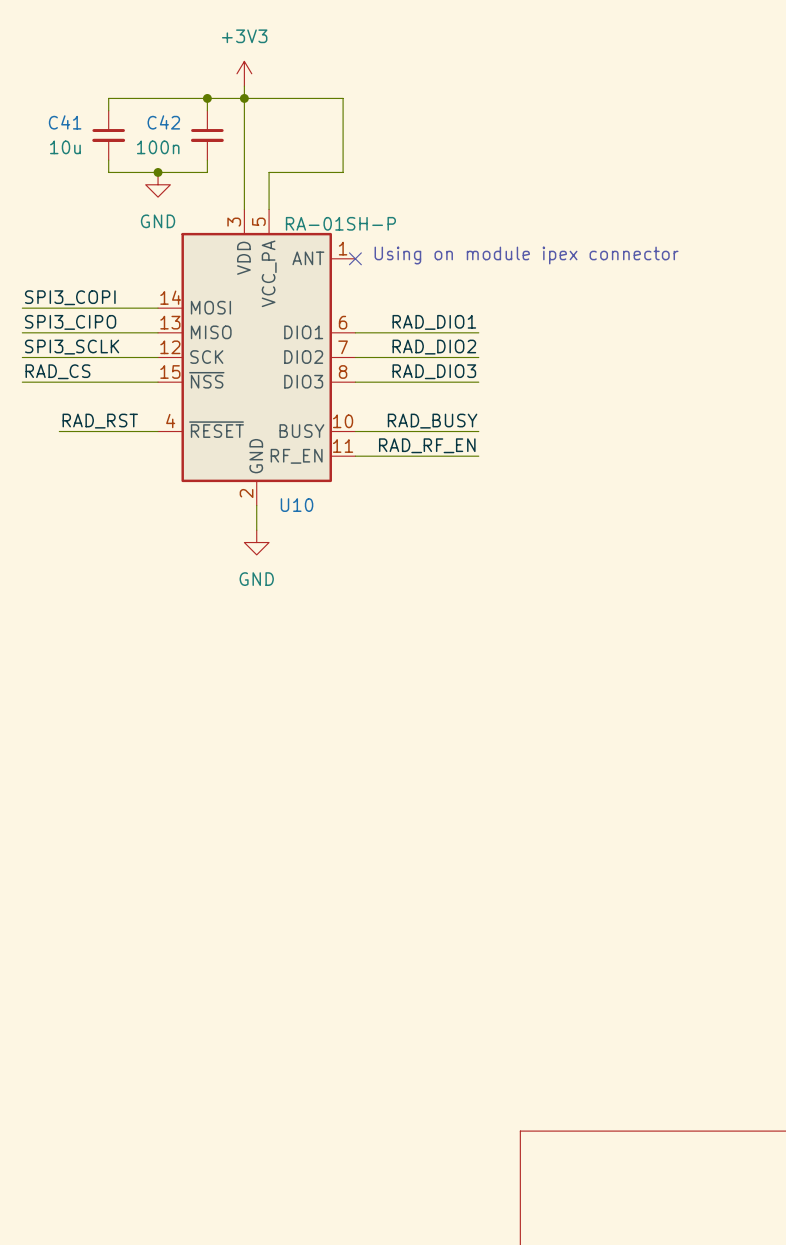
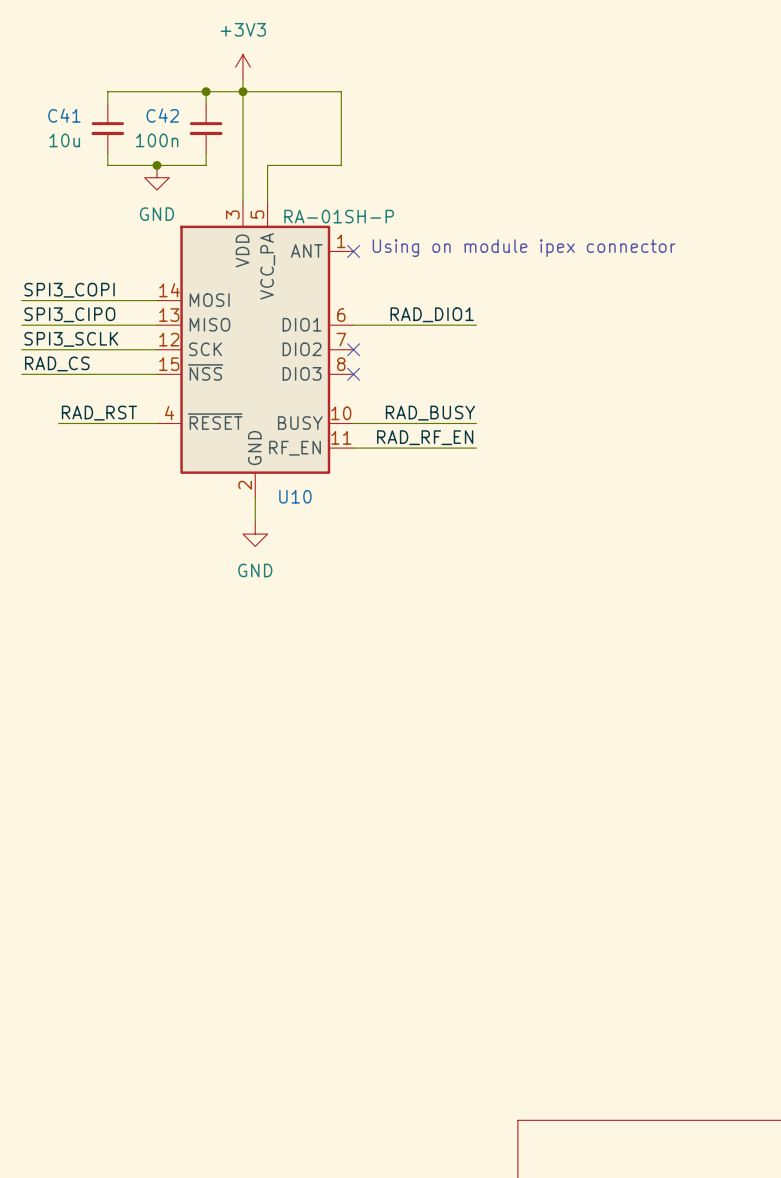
label: RAD_DIO2 (434, 347) -> none
wire: (355, 357) (478, 357) -> none
no-connect mark: none -> (353, 349)
label: RAD_DIO3 (434, 371) -> none
wire: (355, 382) (478, 382) -> none
no-connect mark: none -> (353, 374)

